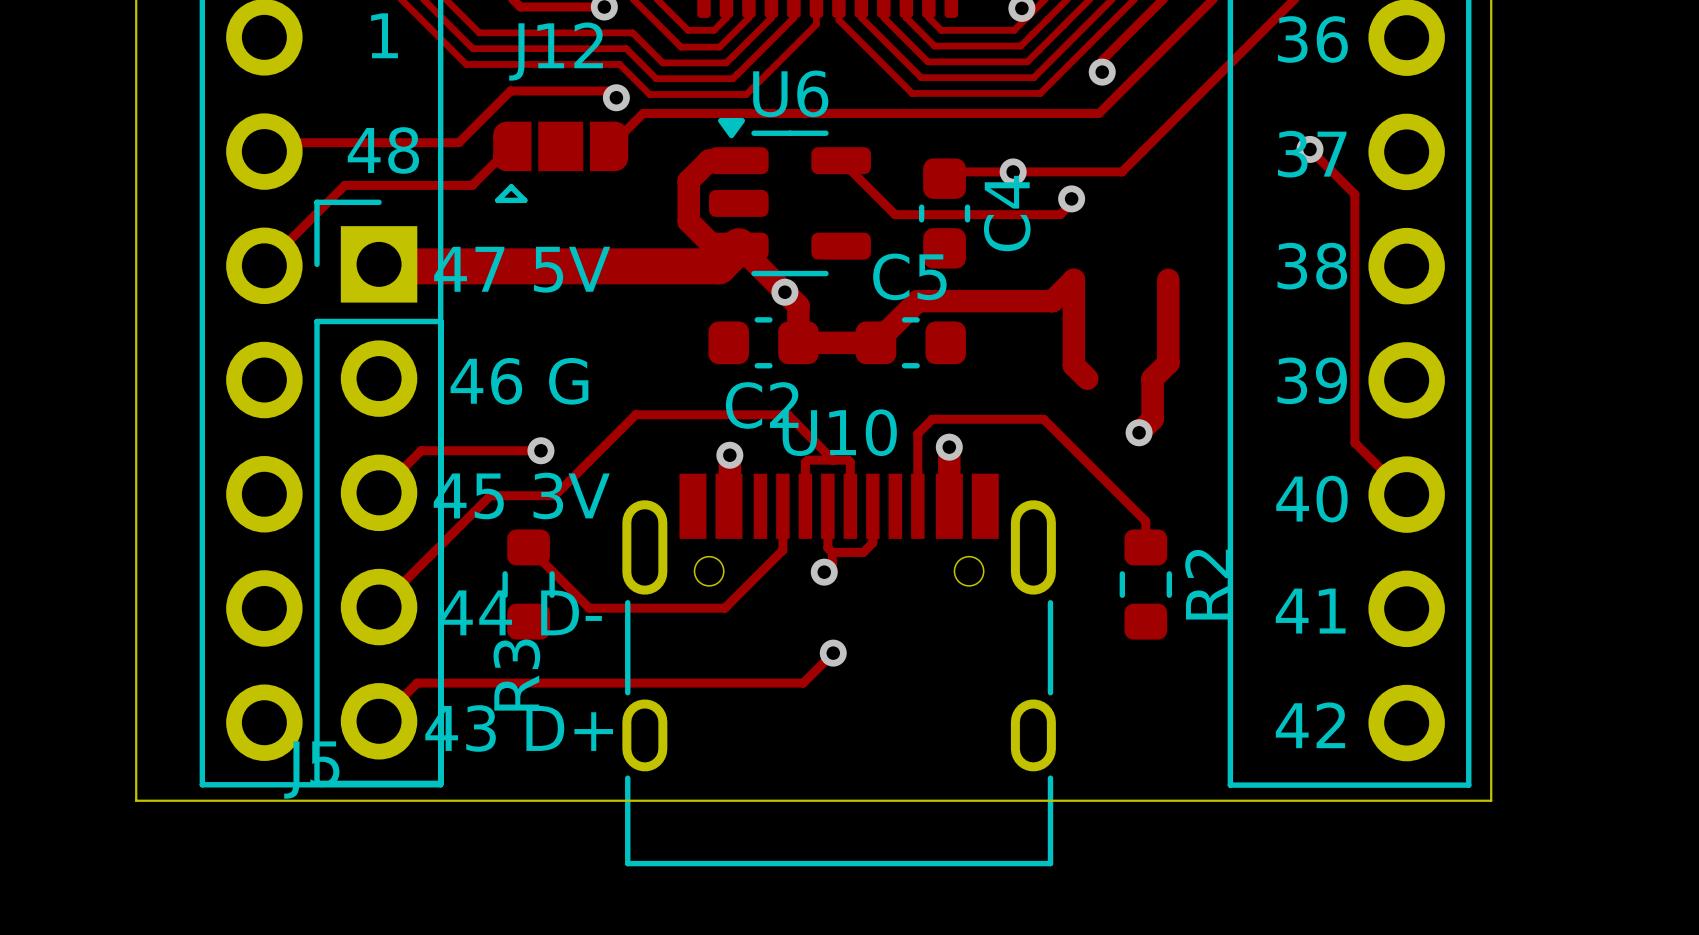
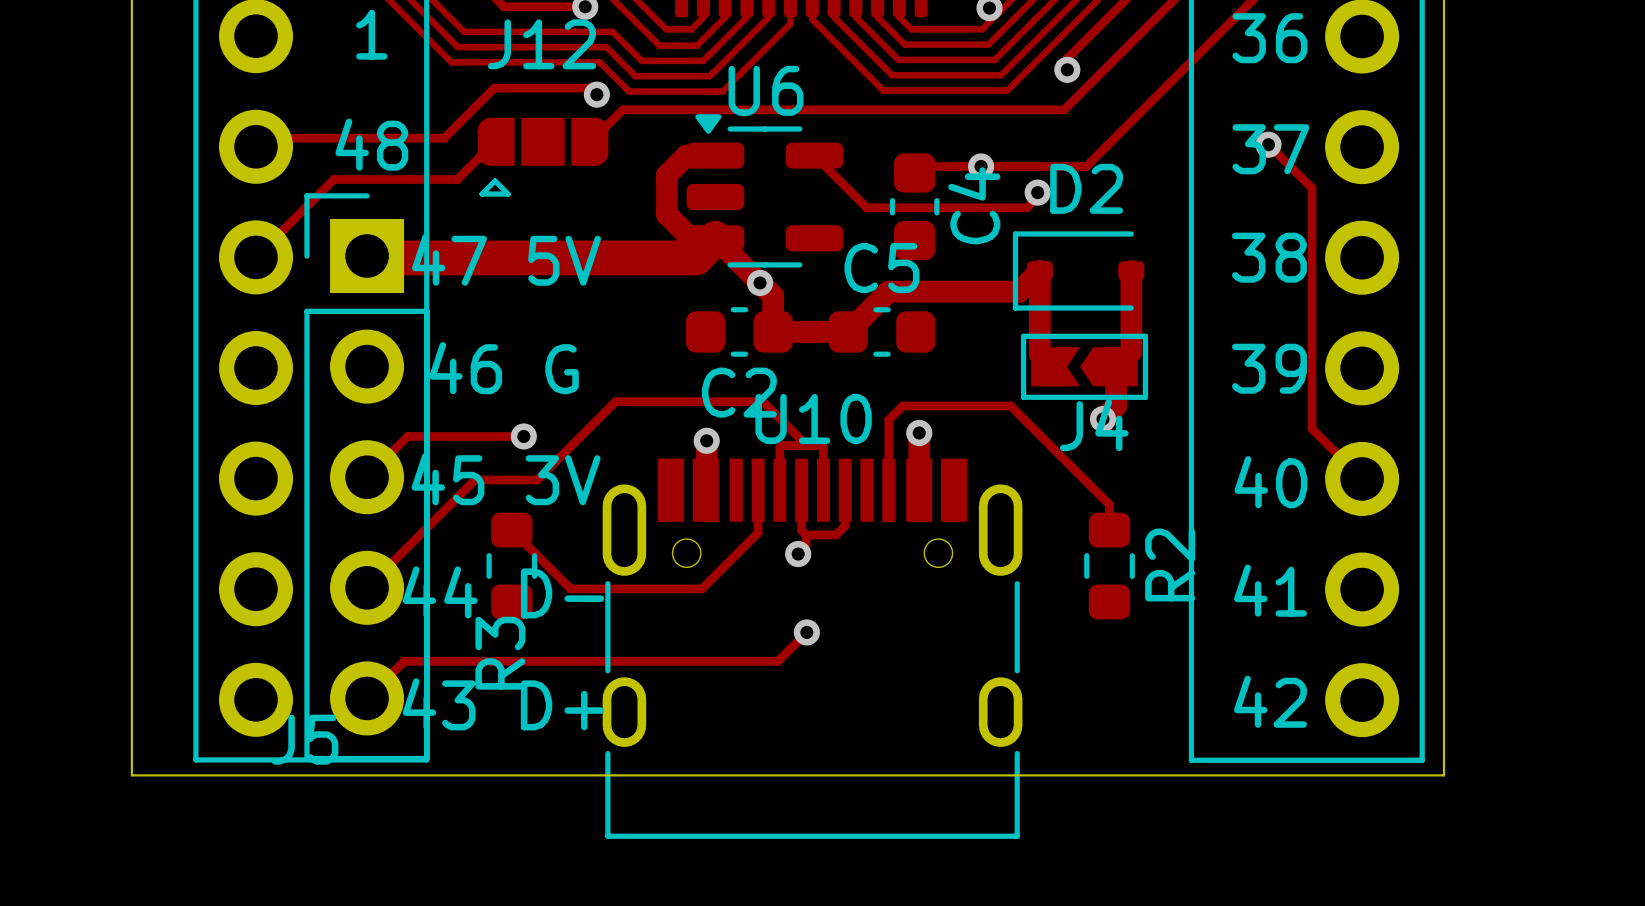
D2: none -> (1078, 270)
J4: none -> (1084, 366)

